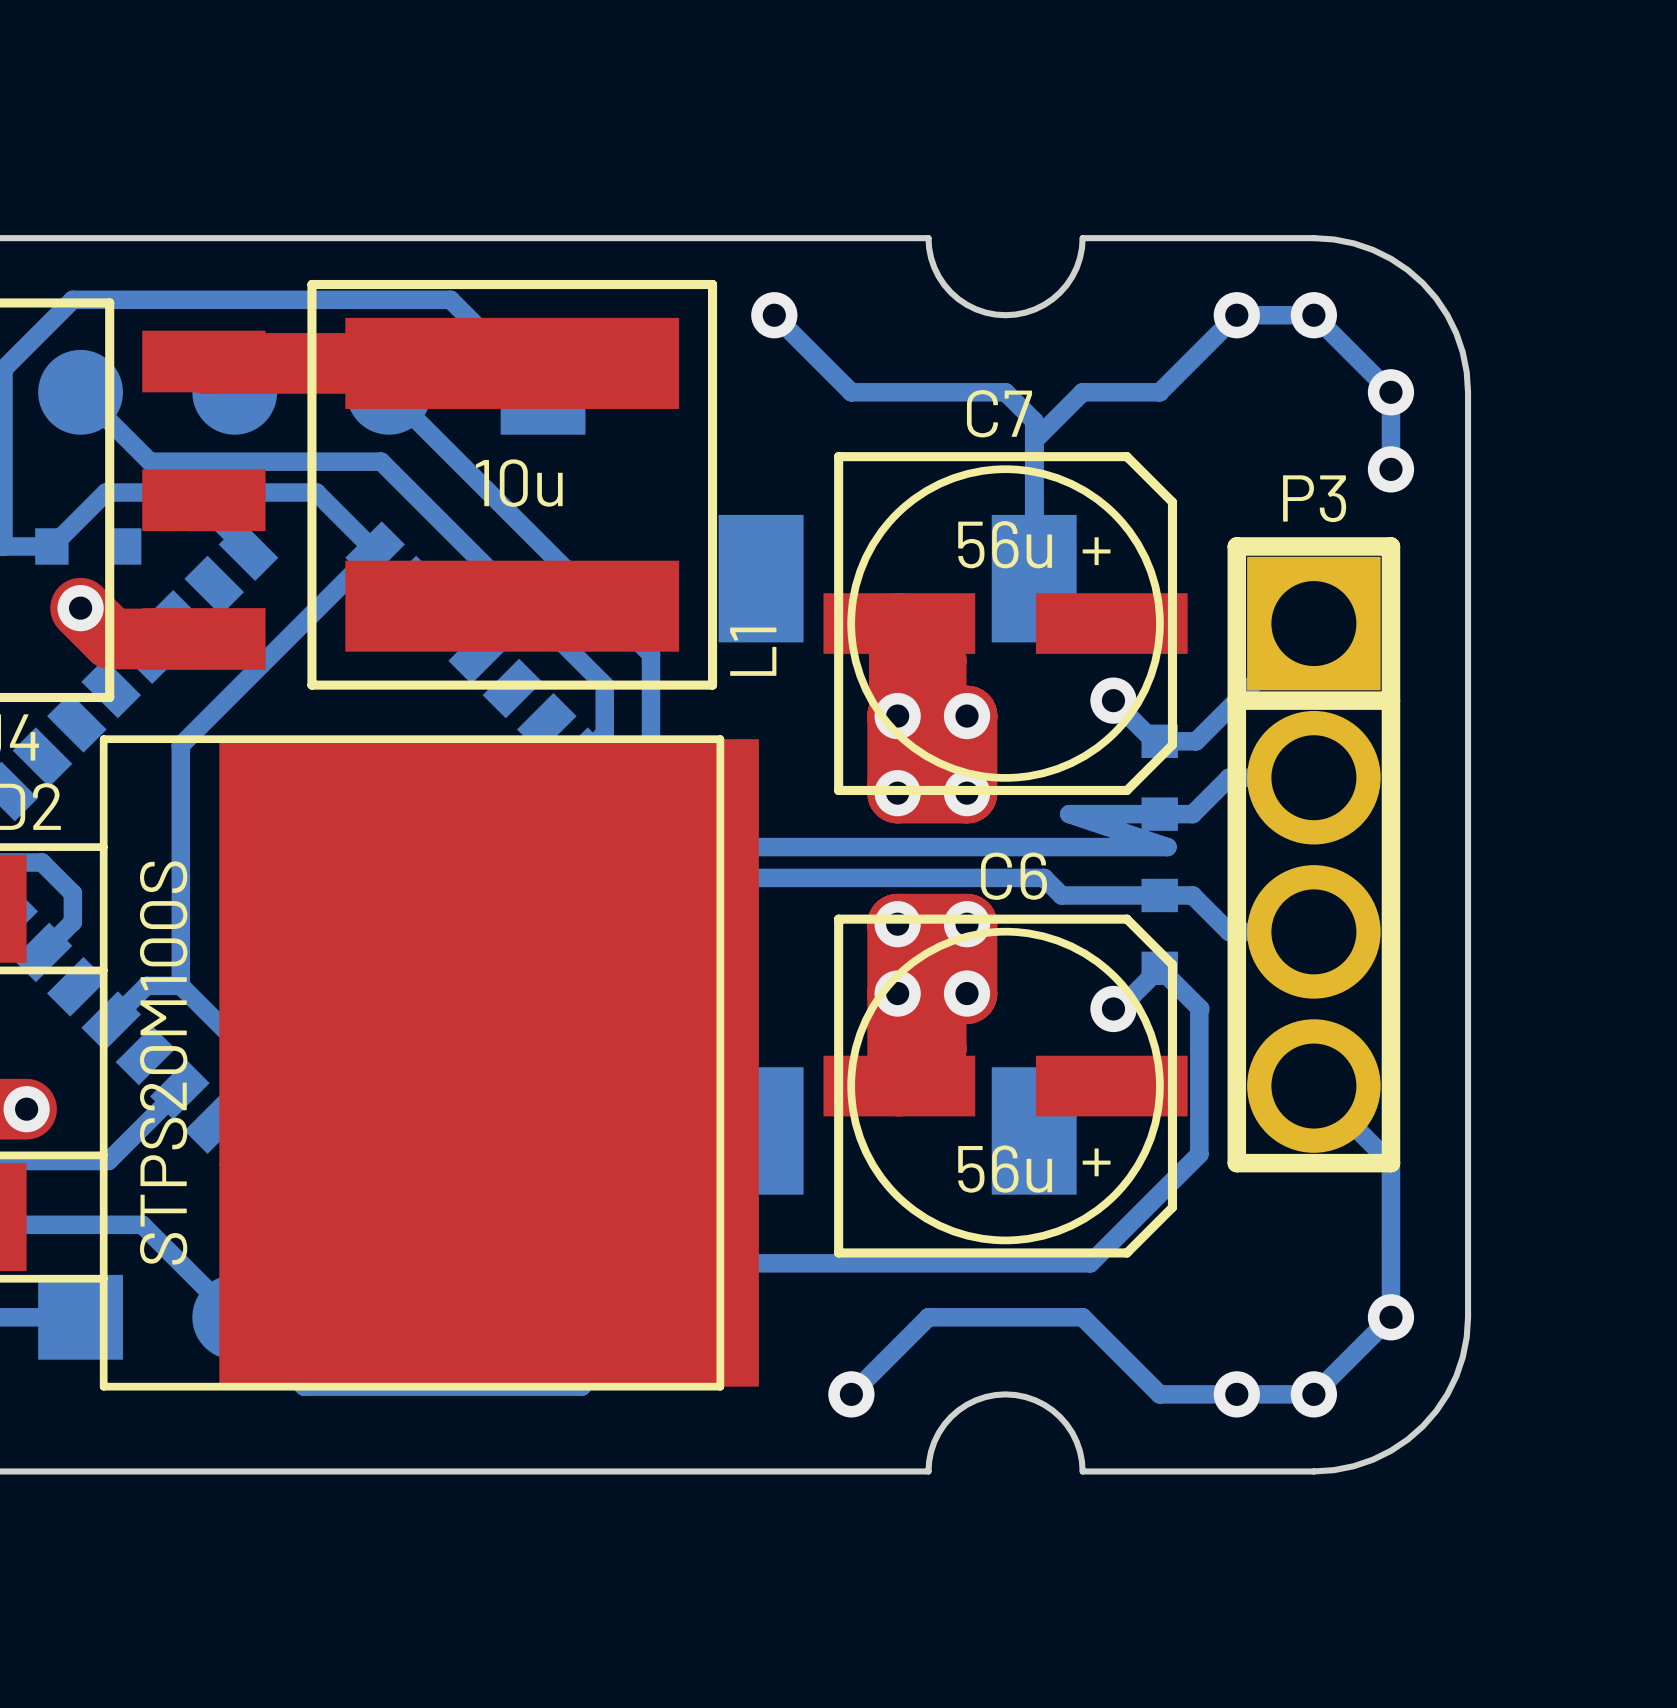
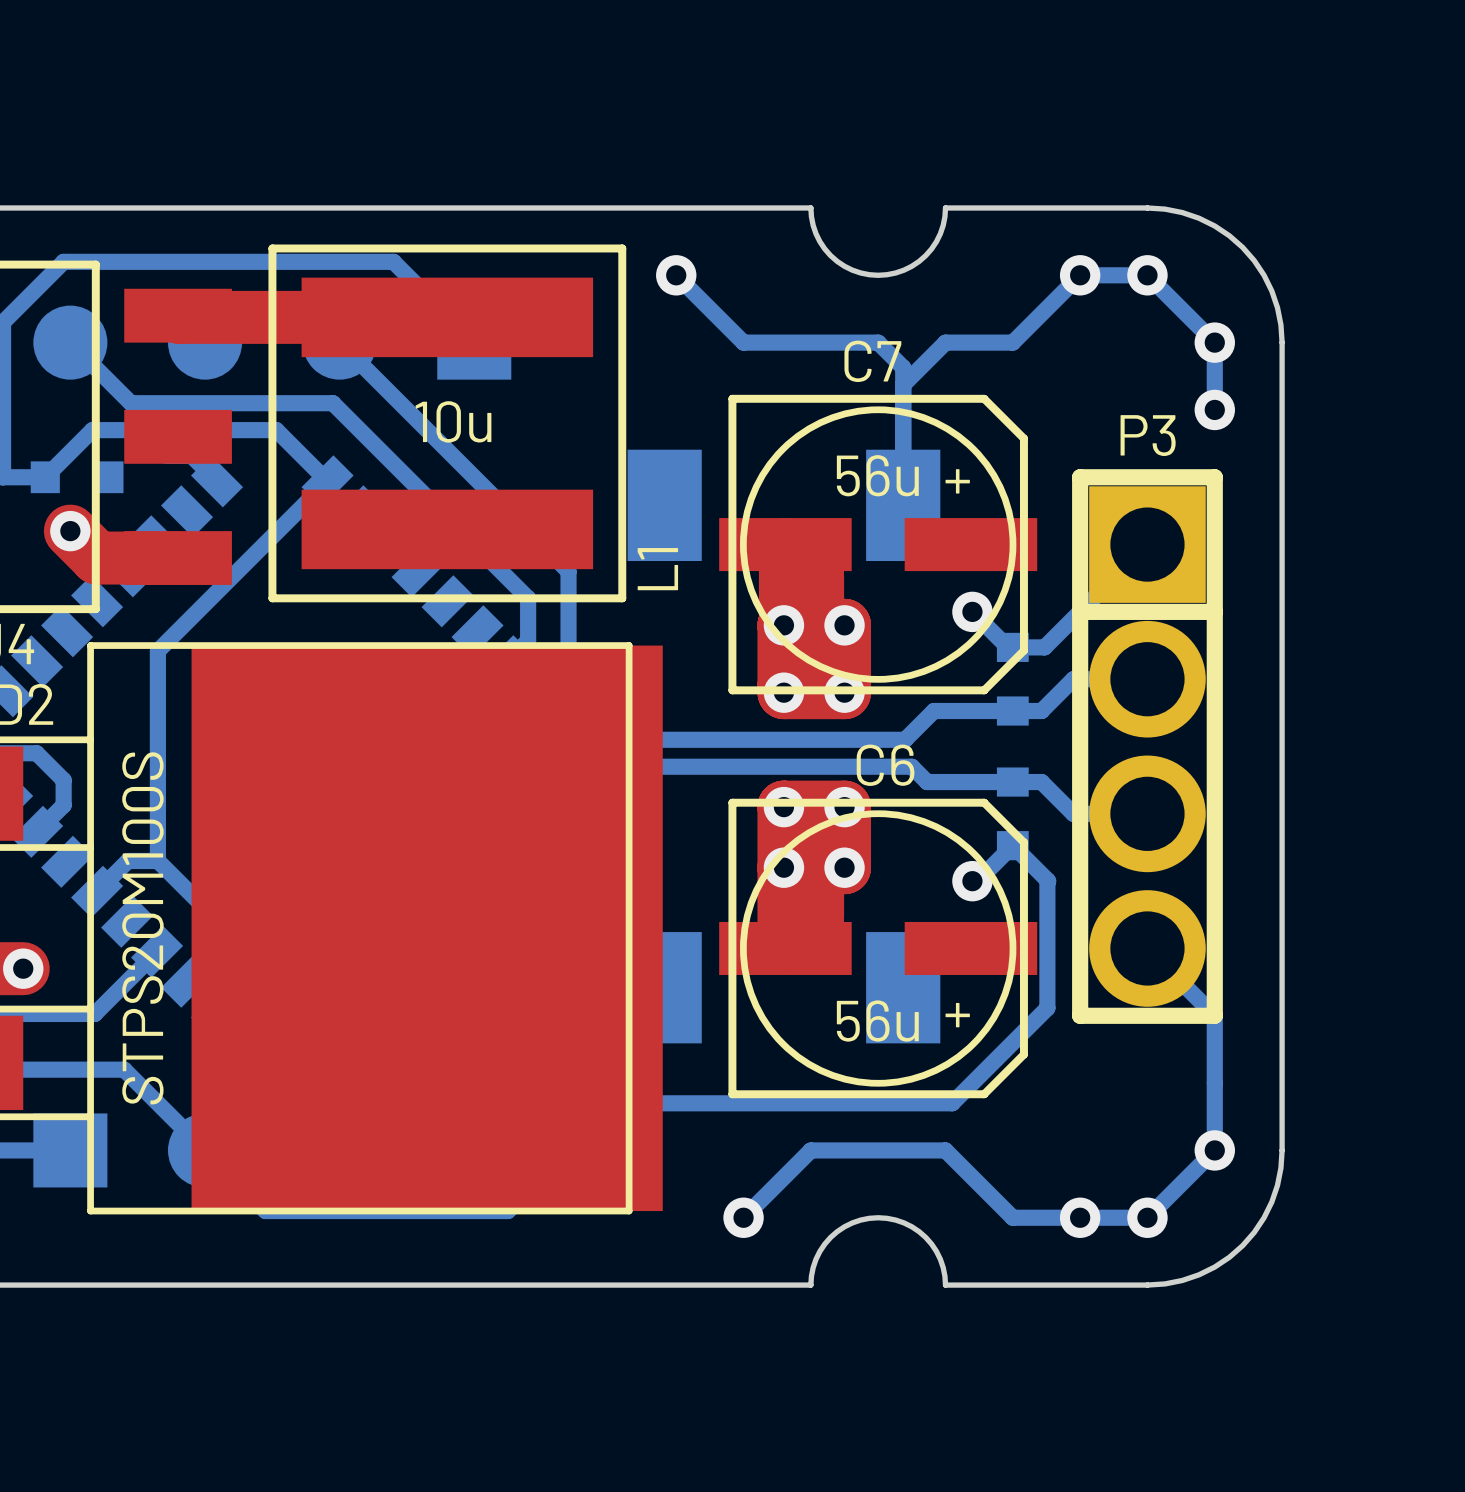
bottom track: (1069, 814) (1167, 847) (1036, 847) -> (933, 711) (905, 739)

